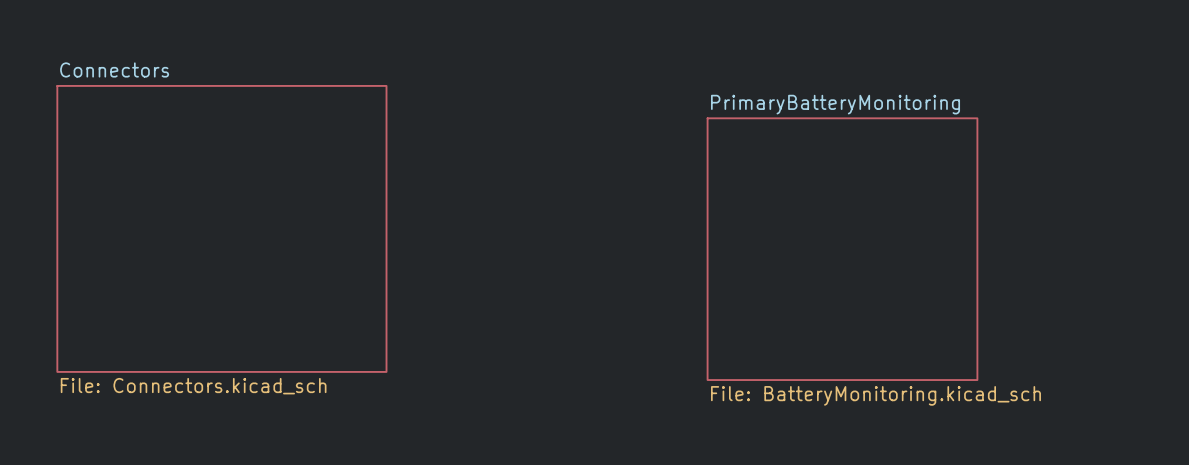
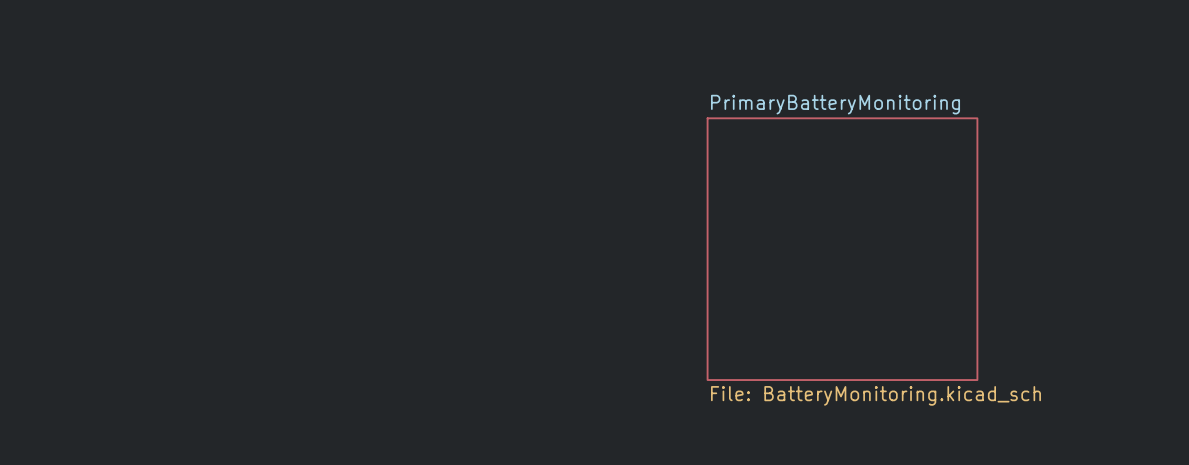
sheet Connectors: File: Connectors.kicad_sch (221, 228) -> none

